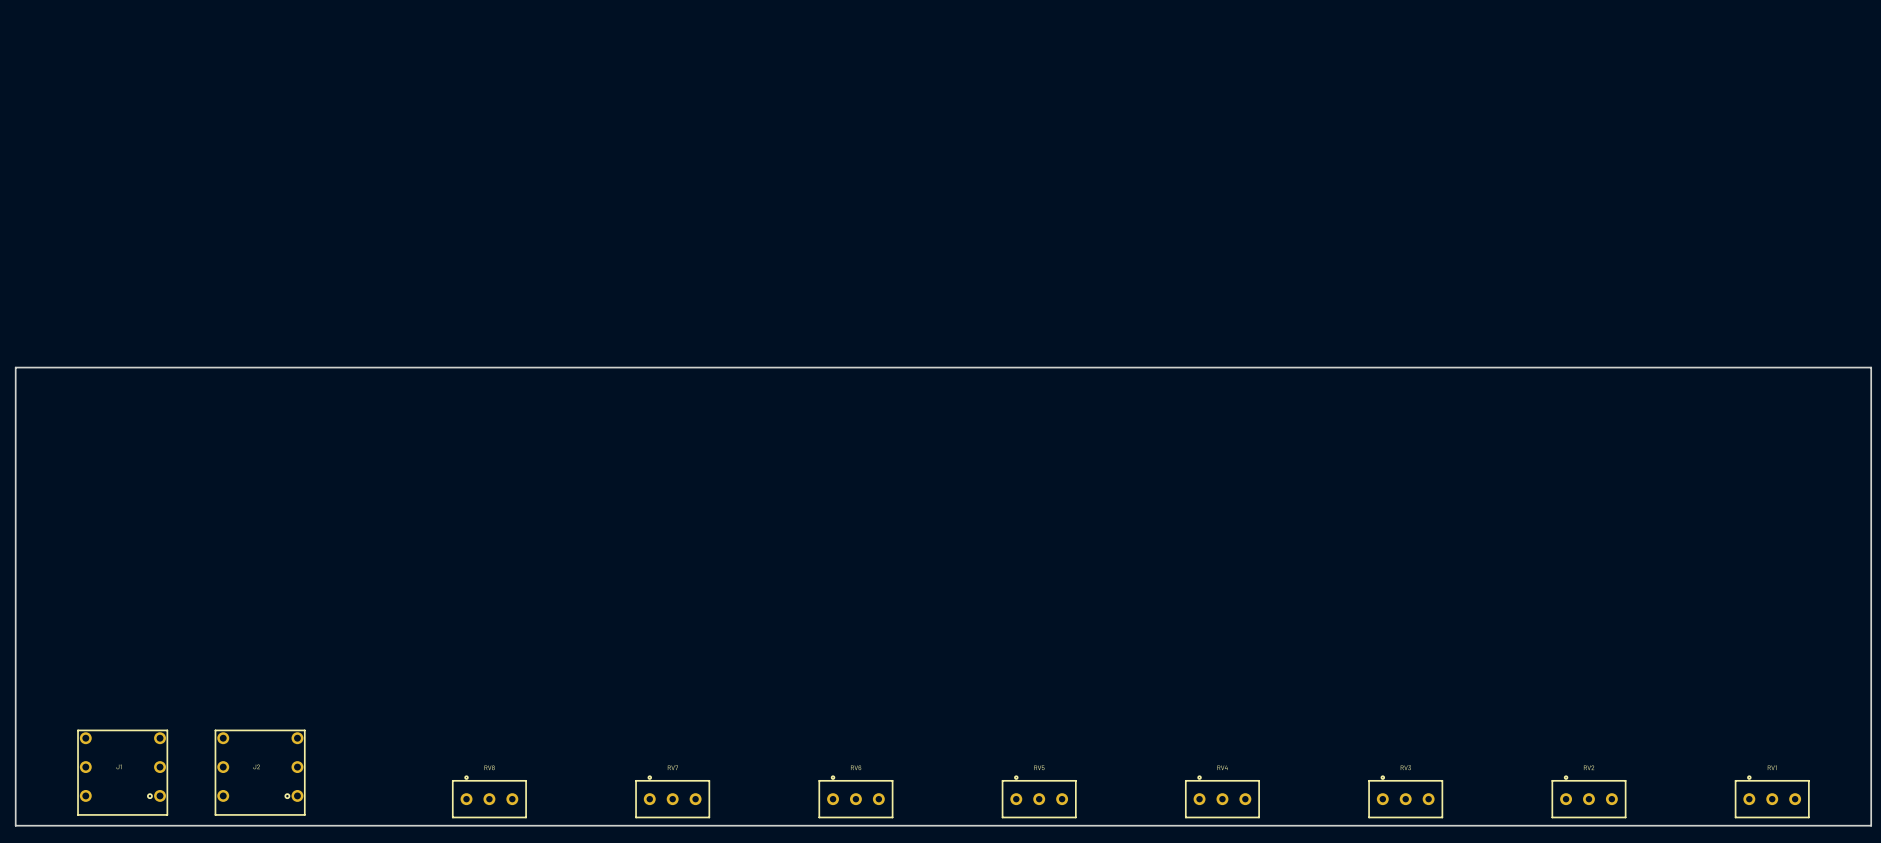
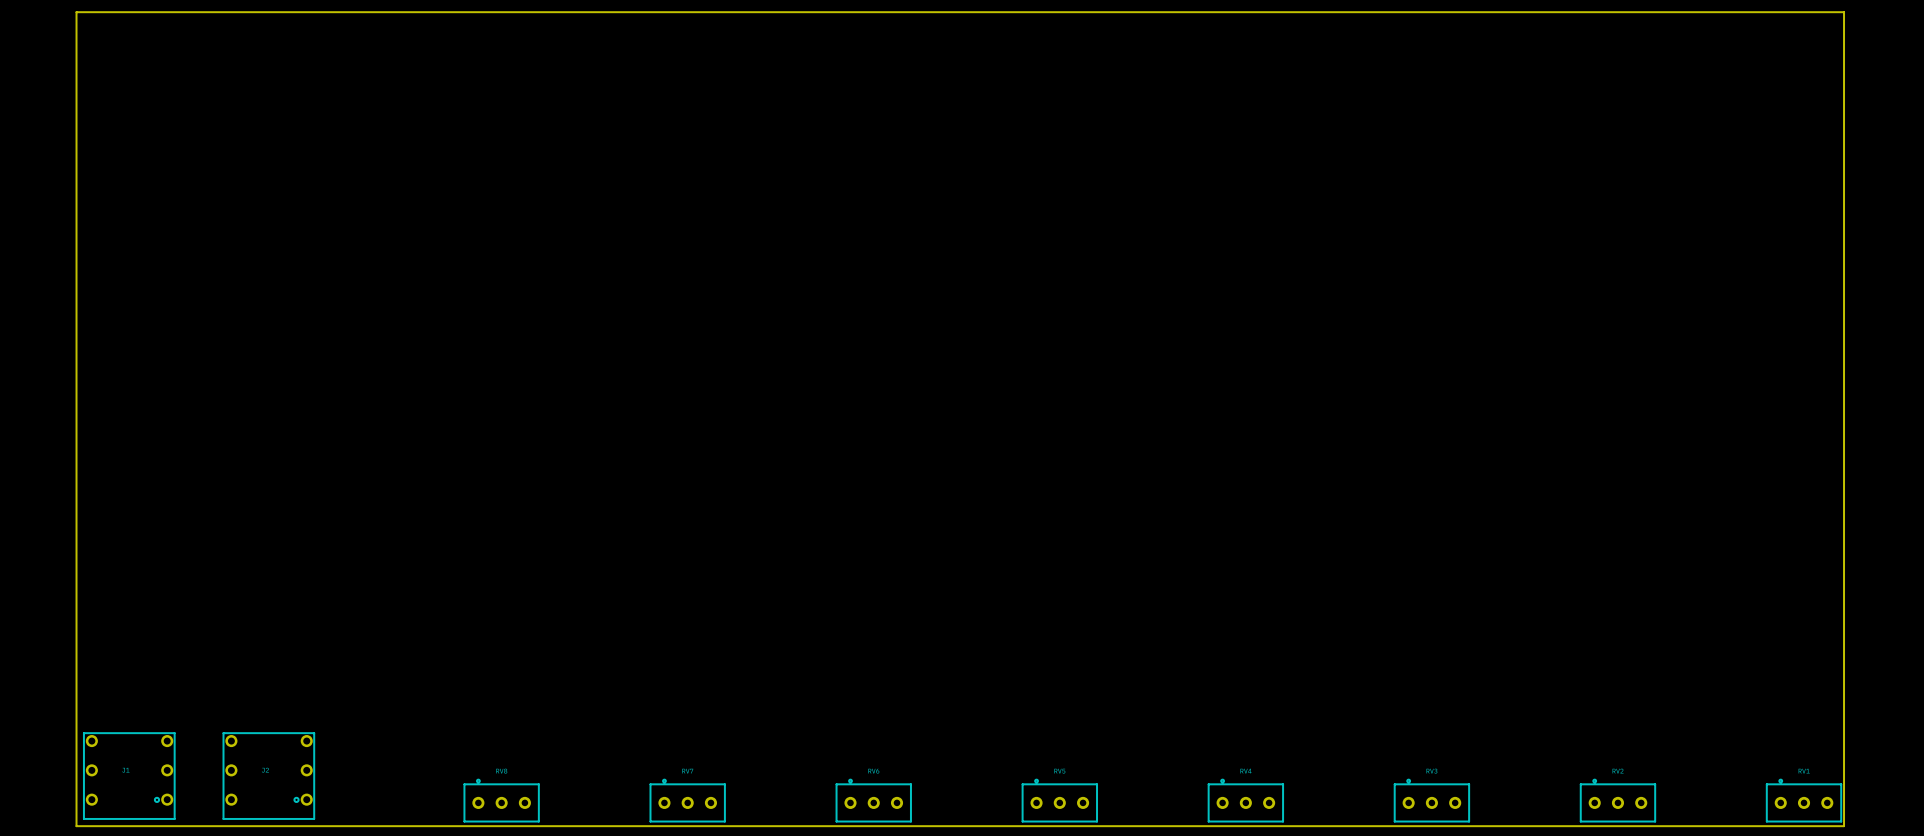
board edge: (15, 367) (1871, 367) (1871, 825) (15, 825) (15, 367) -> (76, 12) (76, 826) (1844, 826) (1844, 12) (76, 12)

